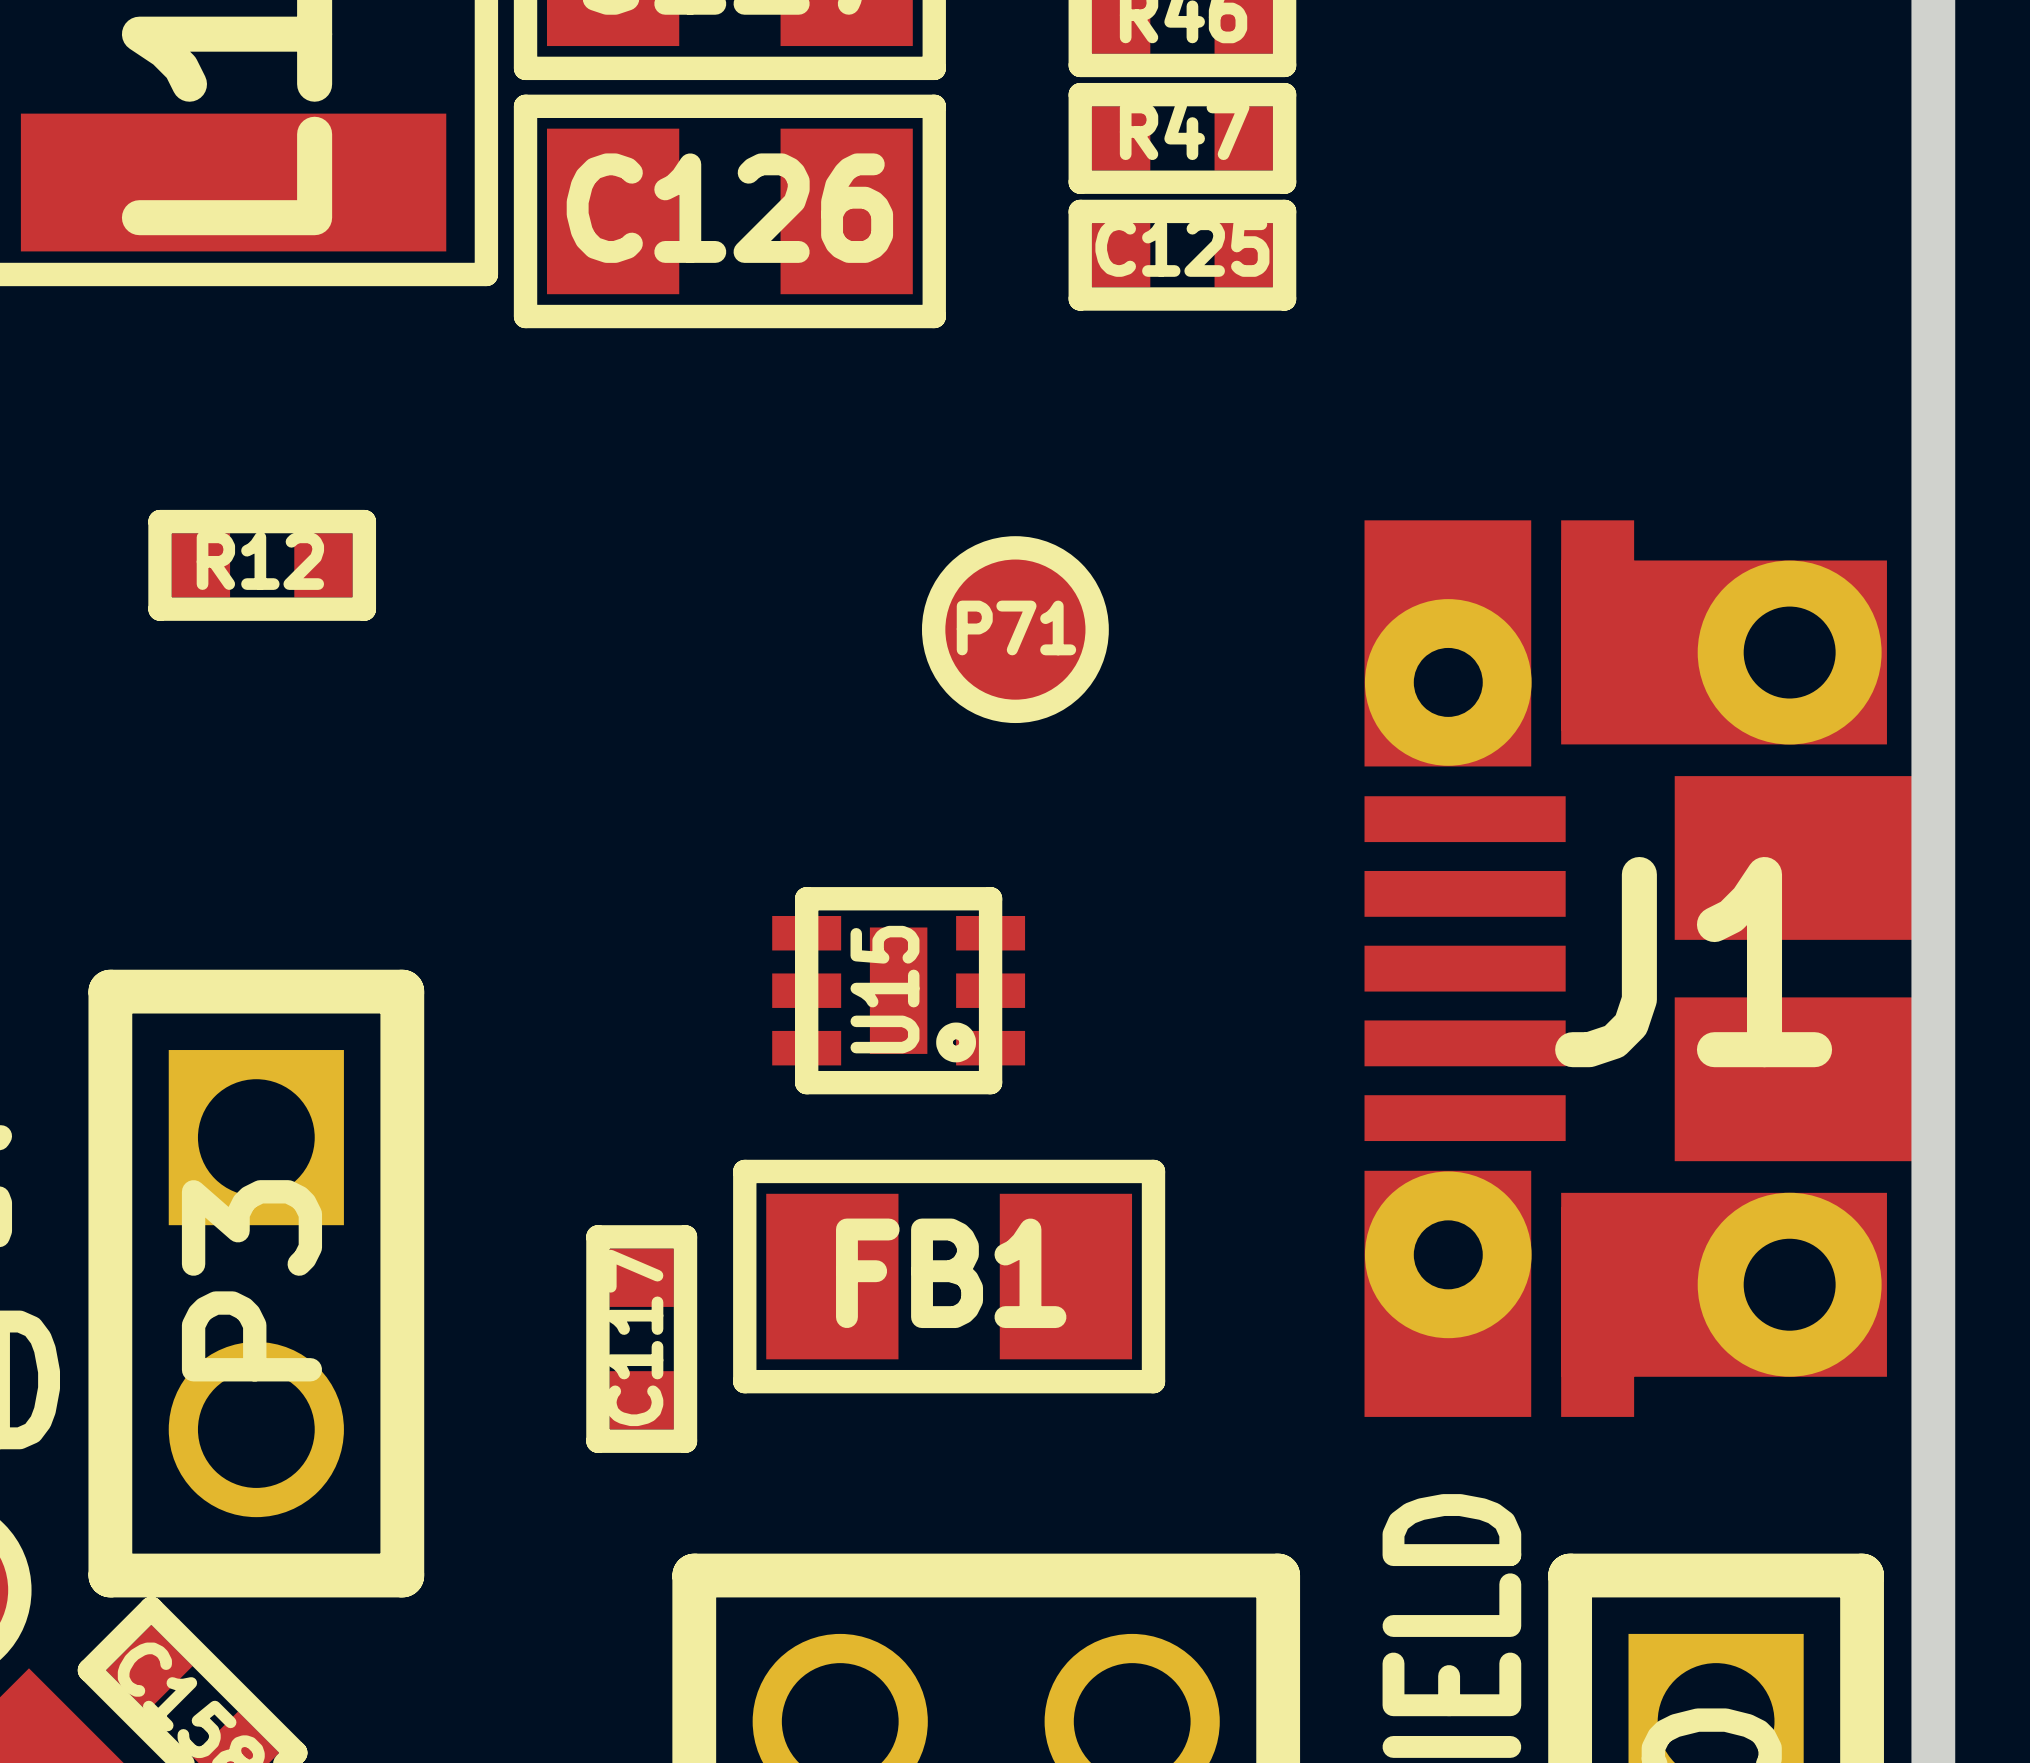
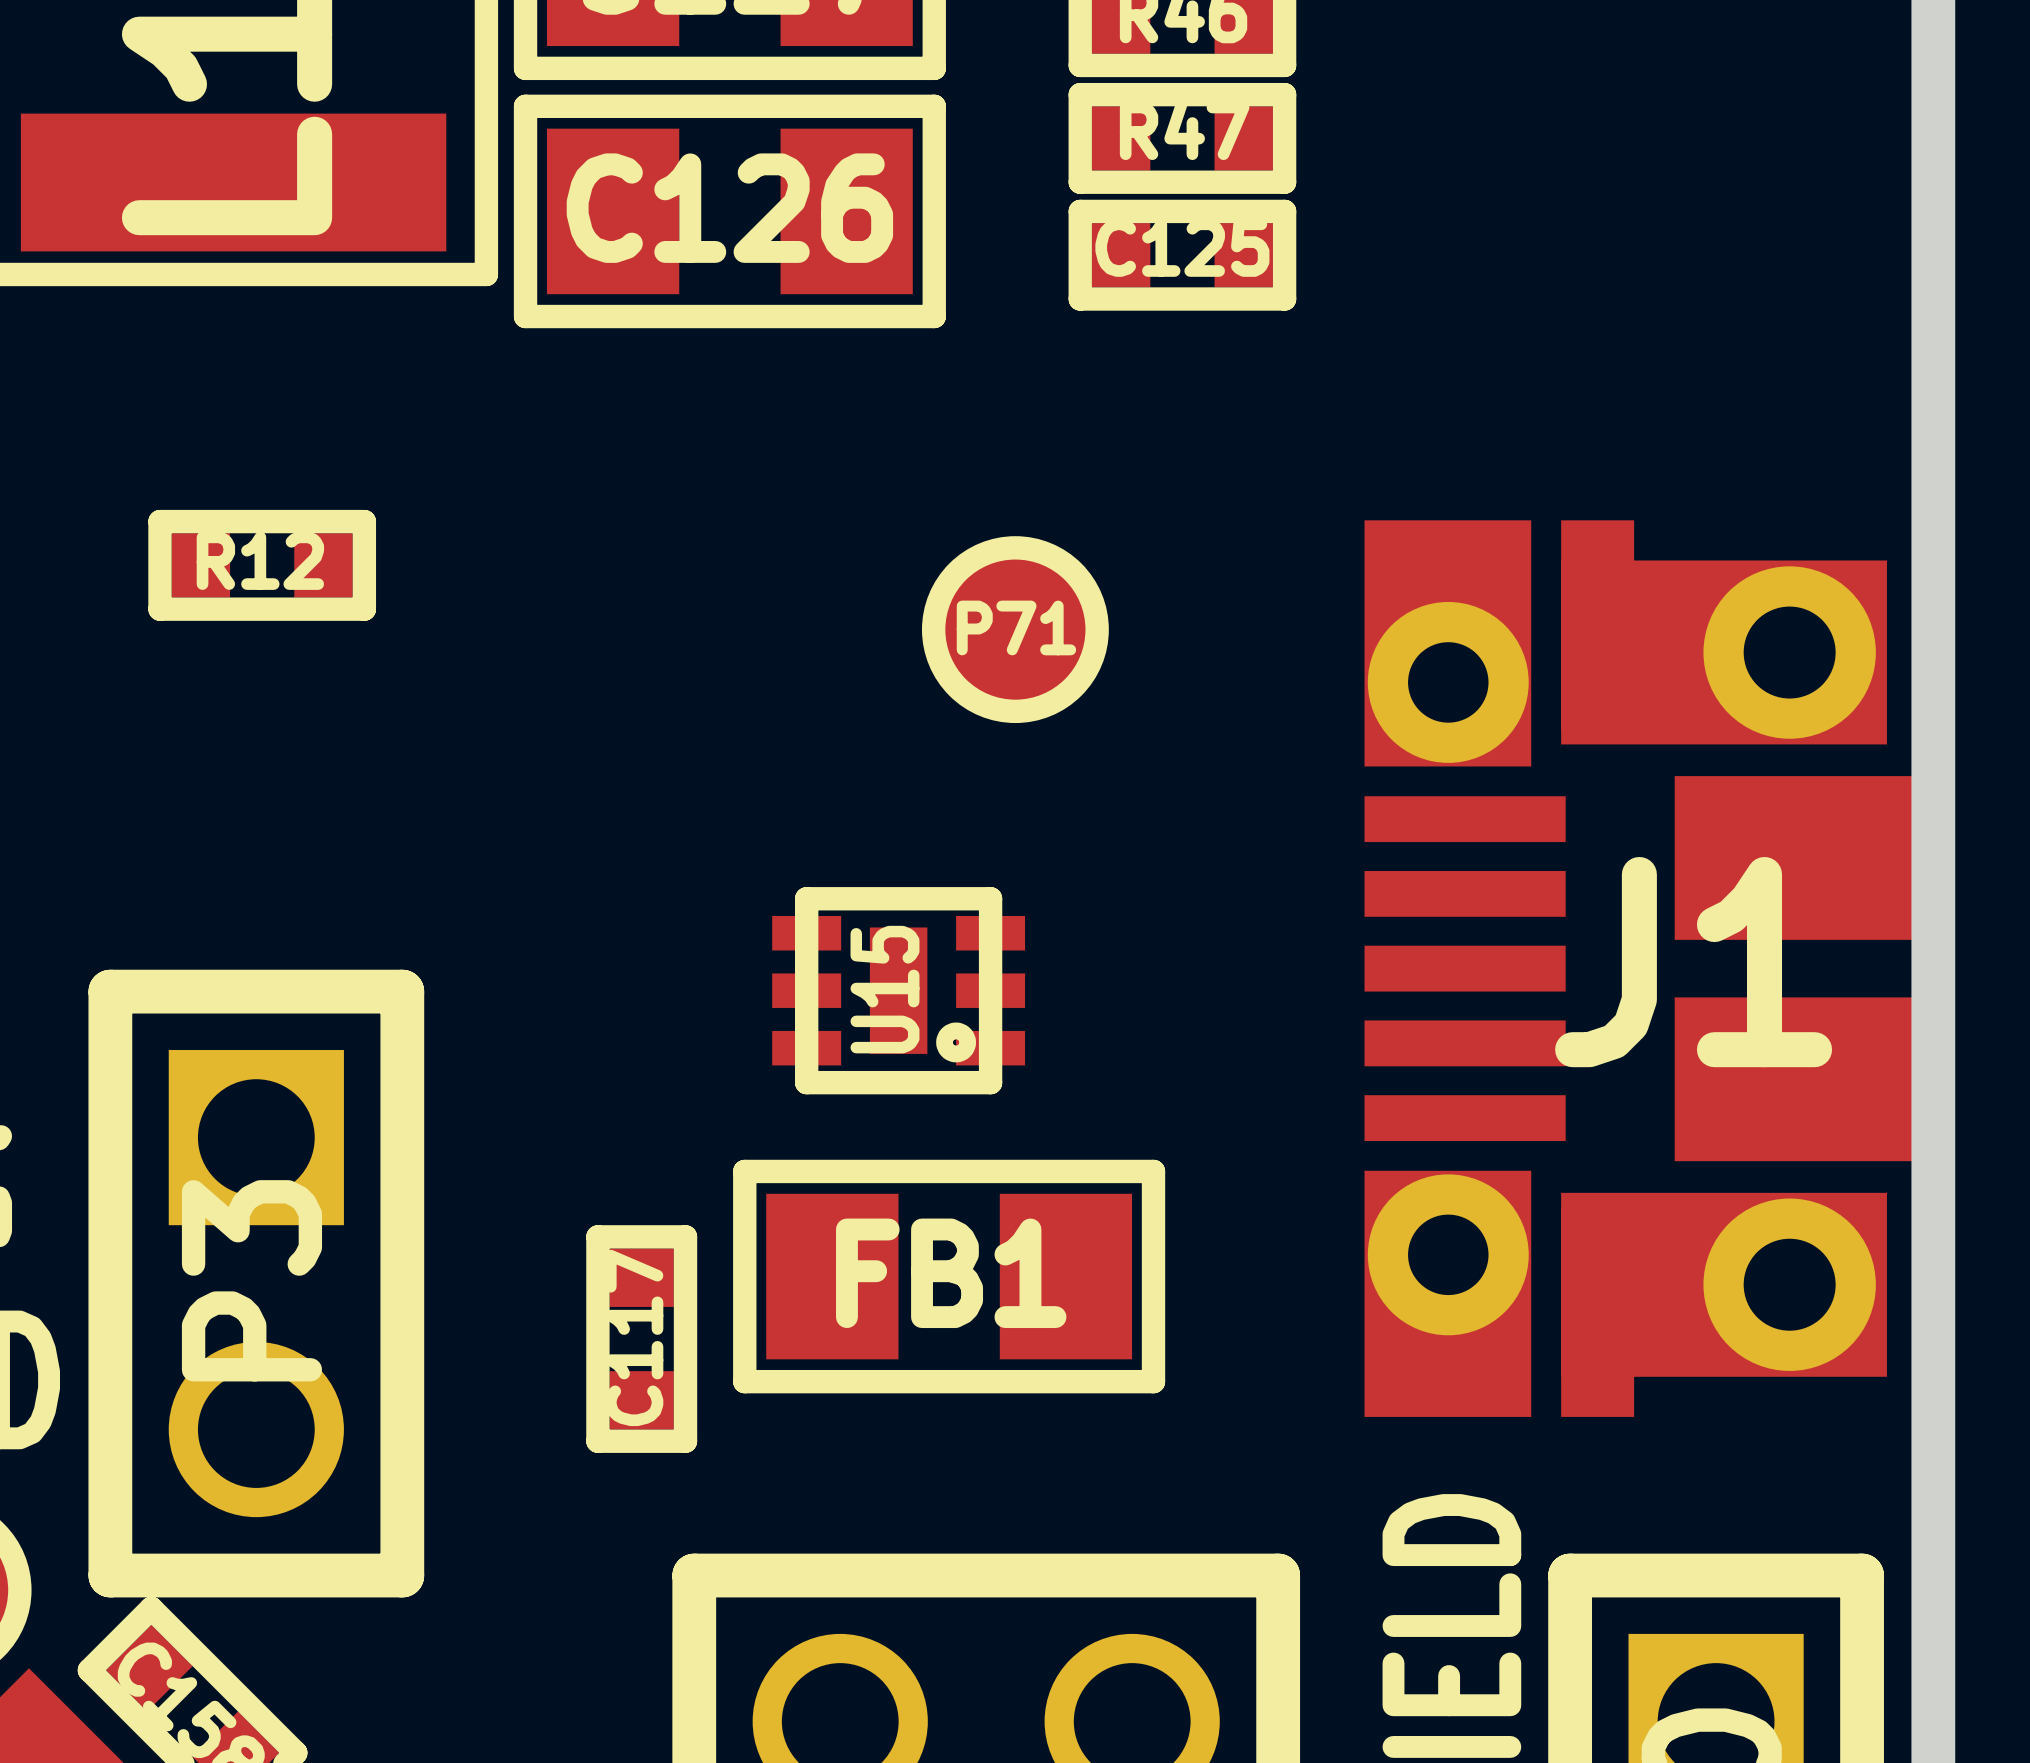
J1 footprint: [1364, 520, 1913, 1417] -> [1364, 520, 1913, 1417]

